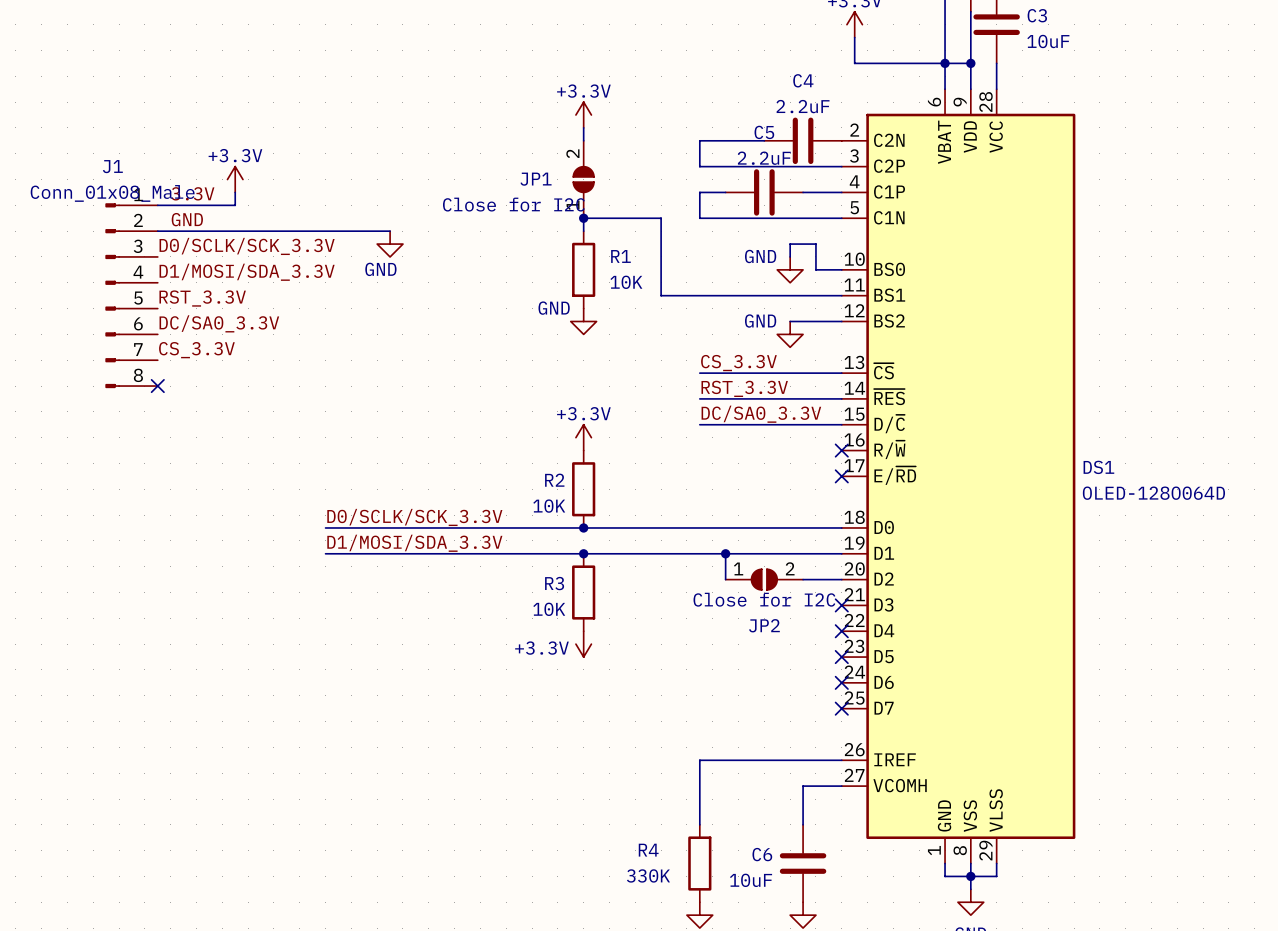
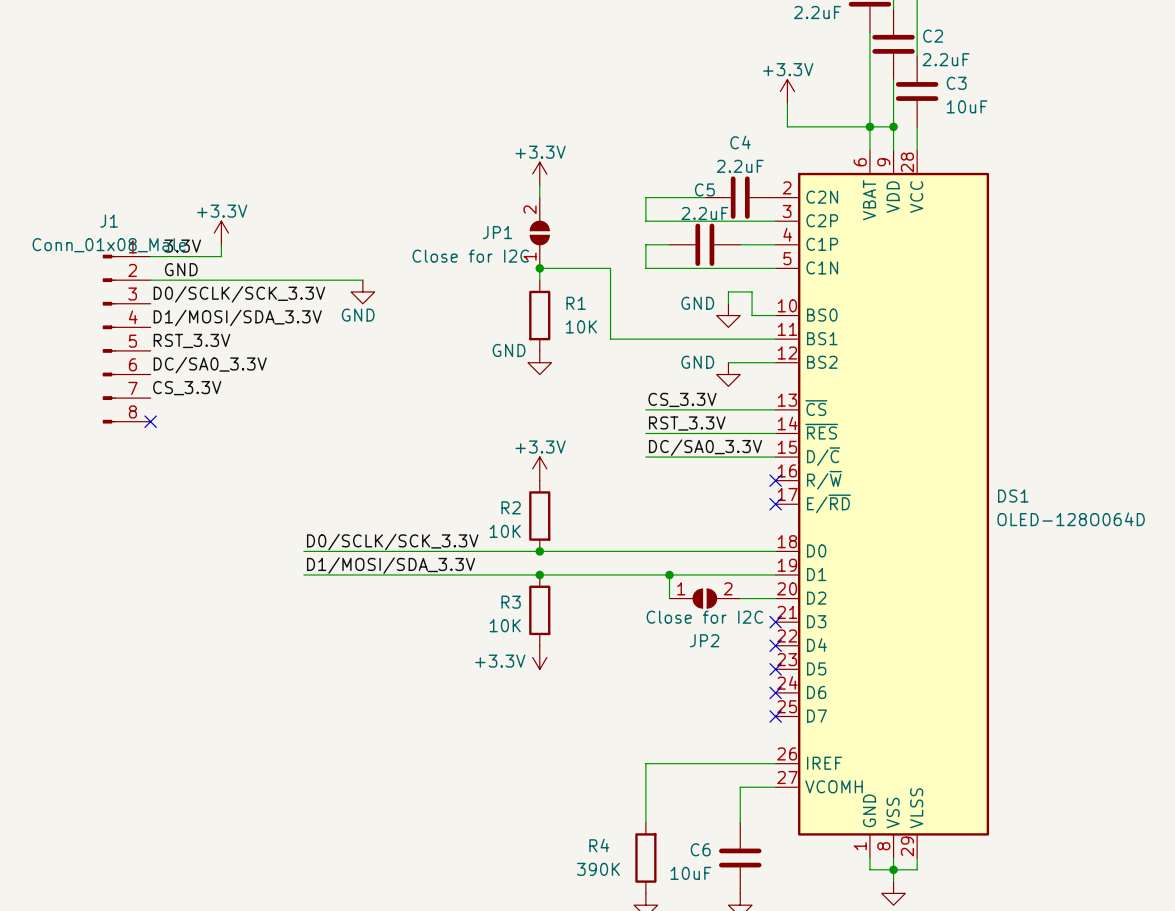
R4 value: 330K (648, 875) -> 390K (598, 869)

